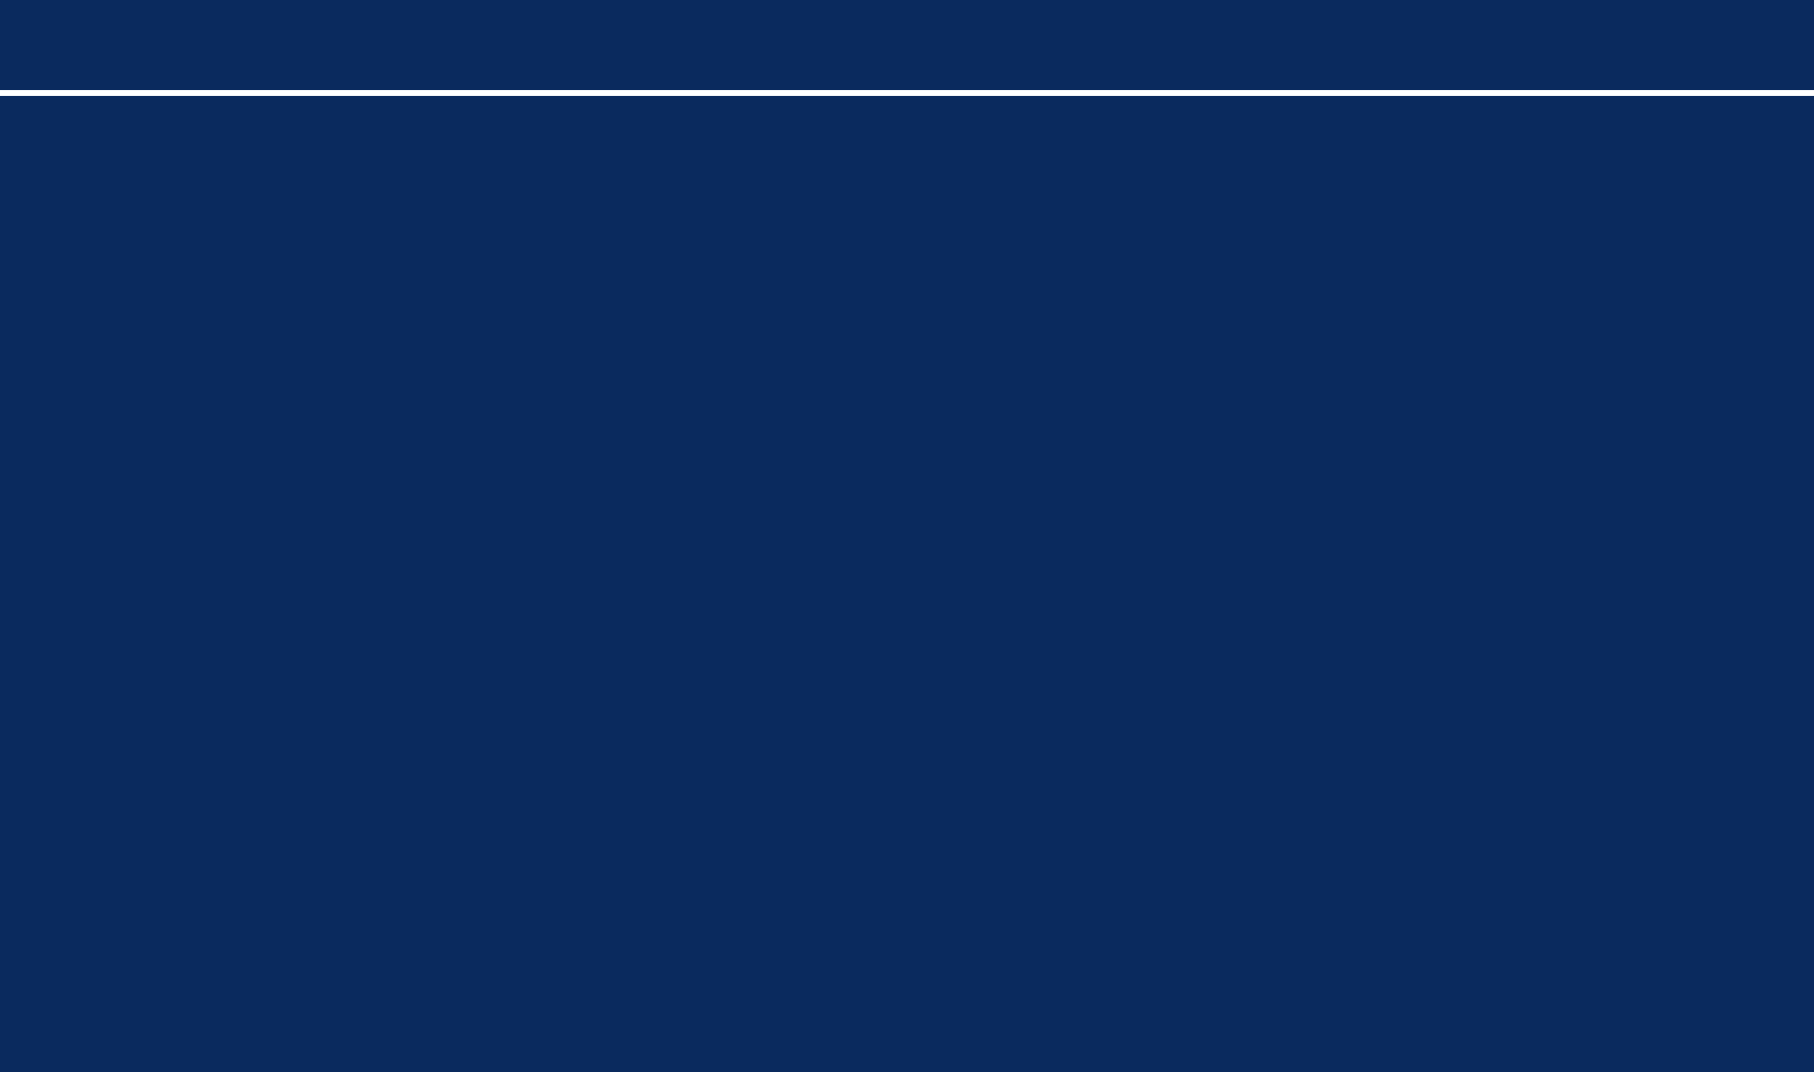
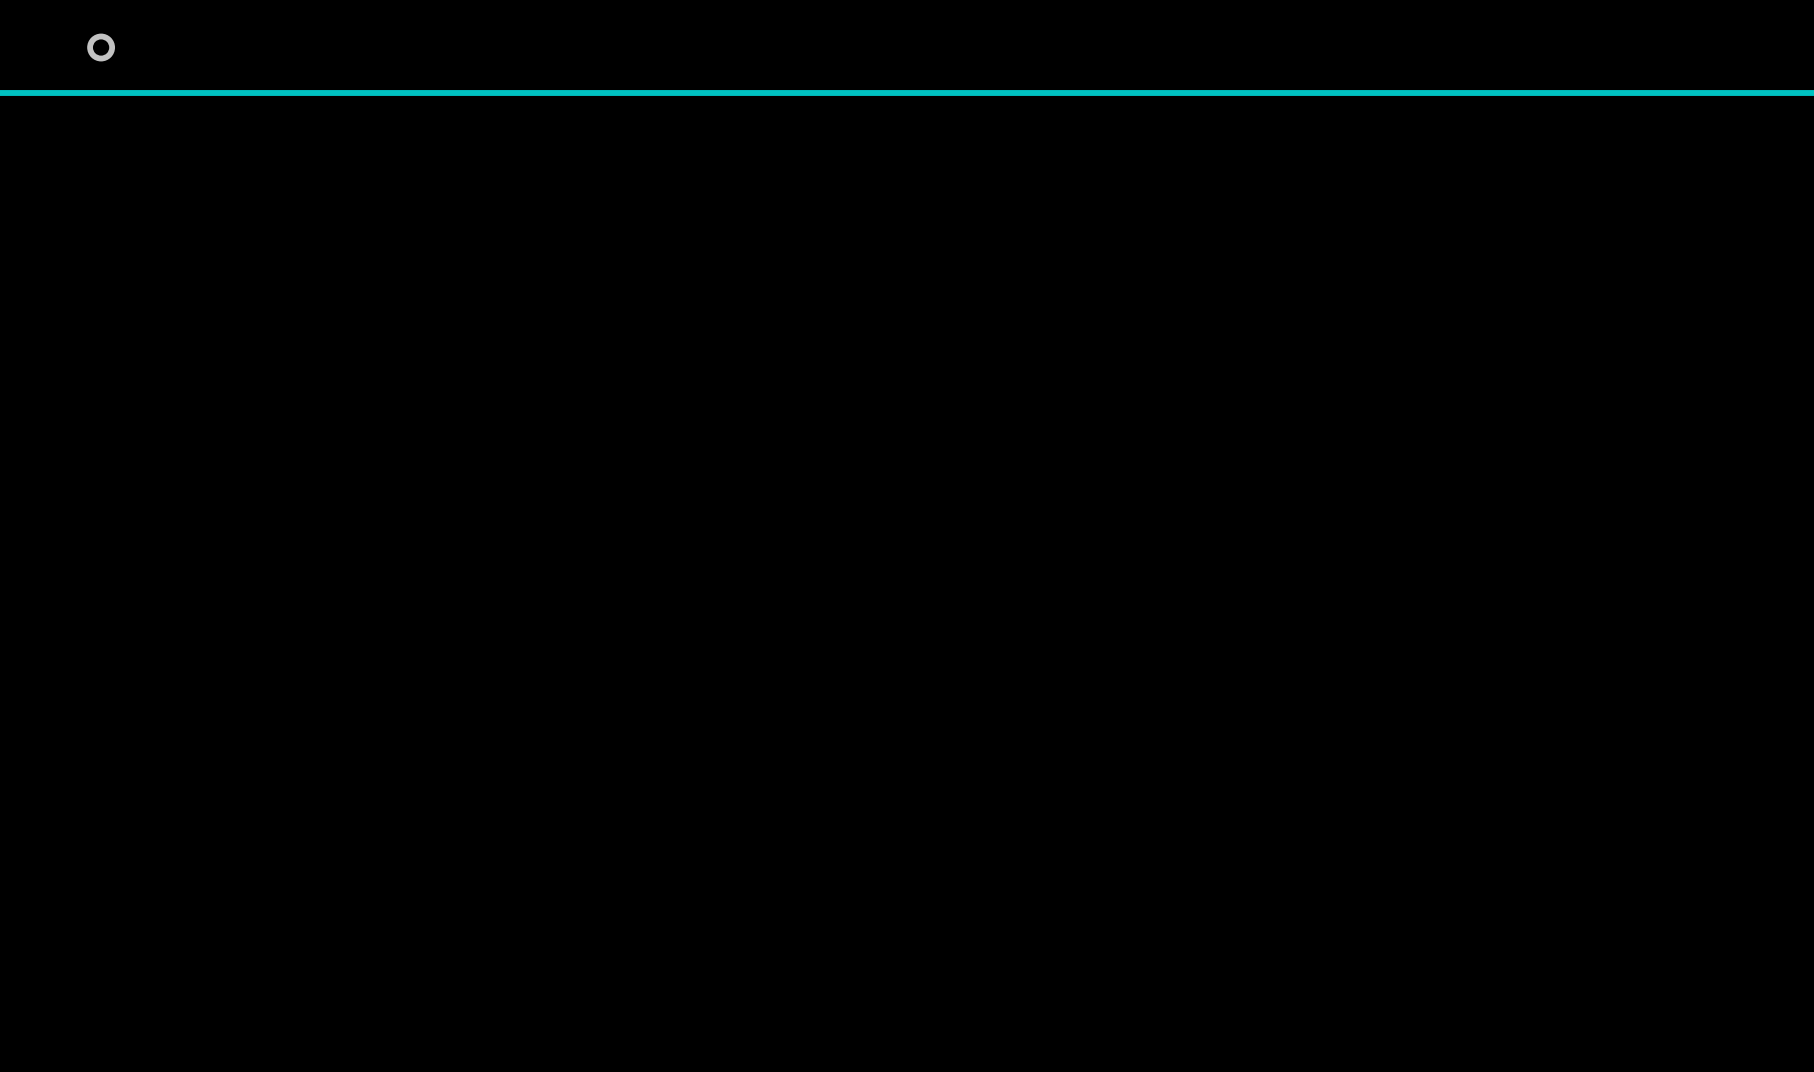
via: none -> (101, 47)

